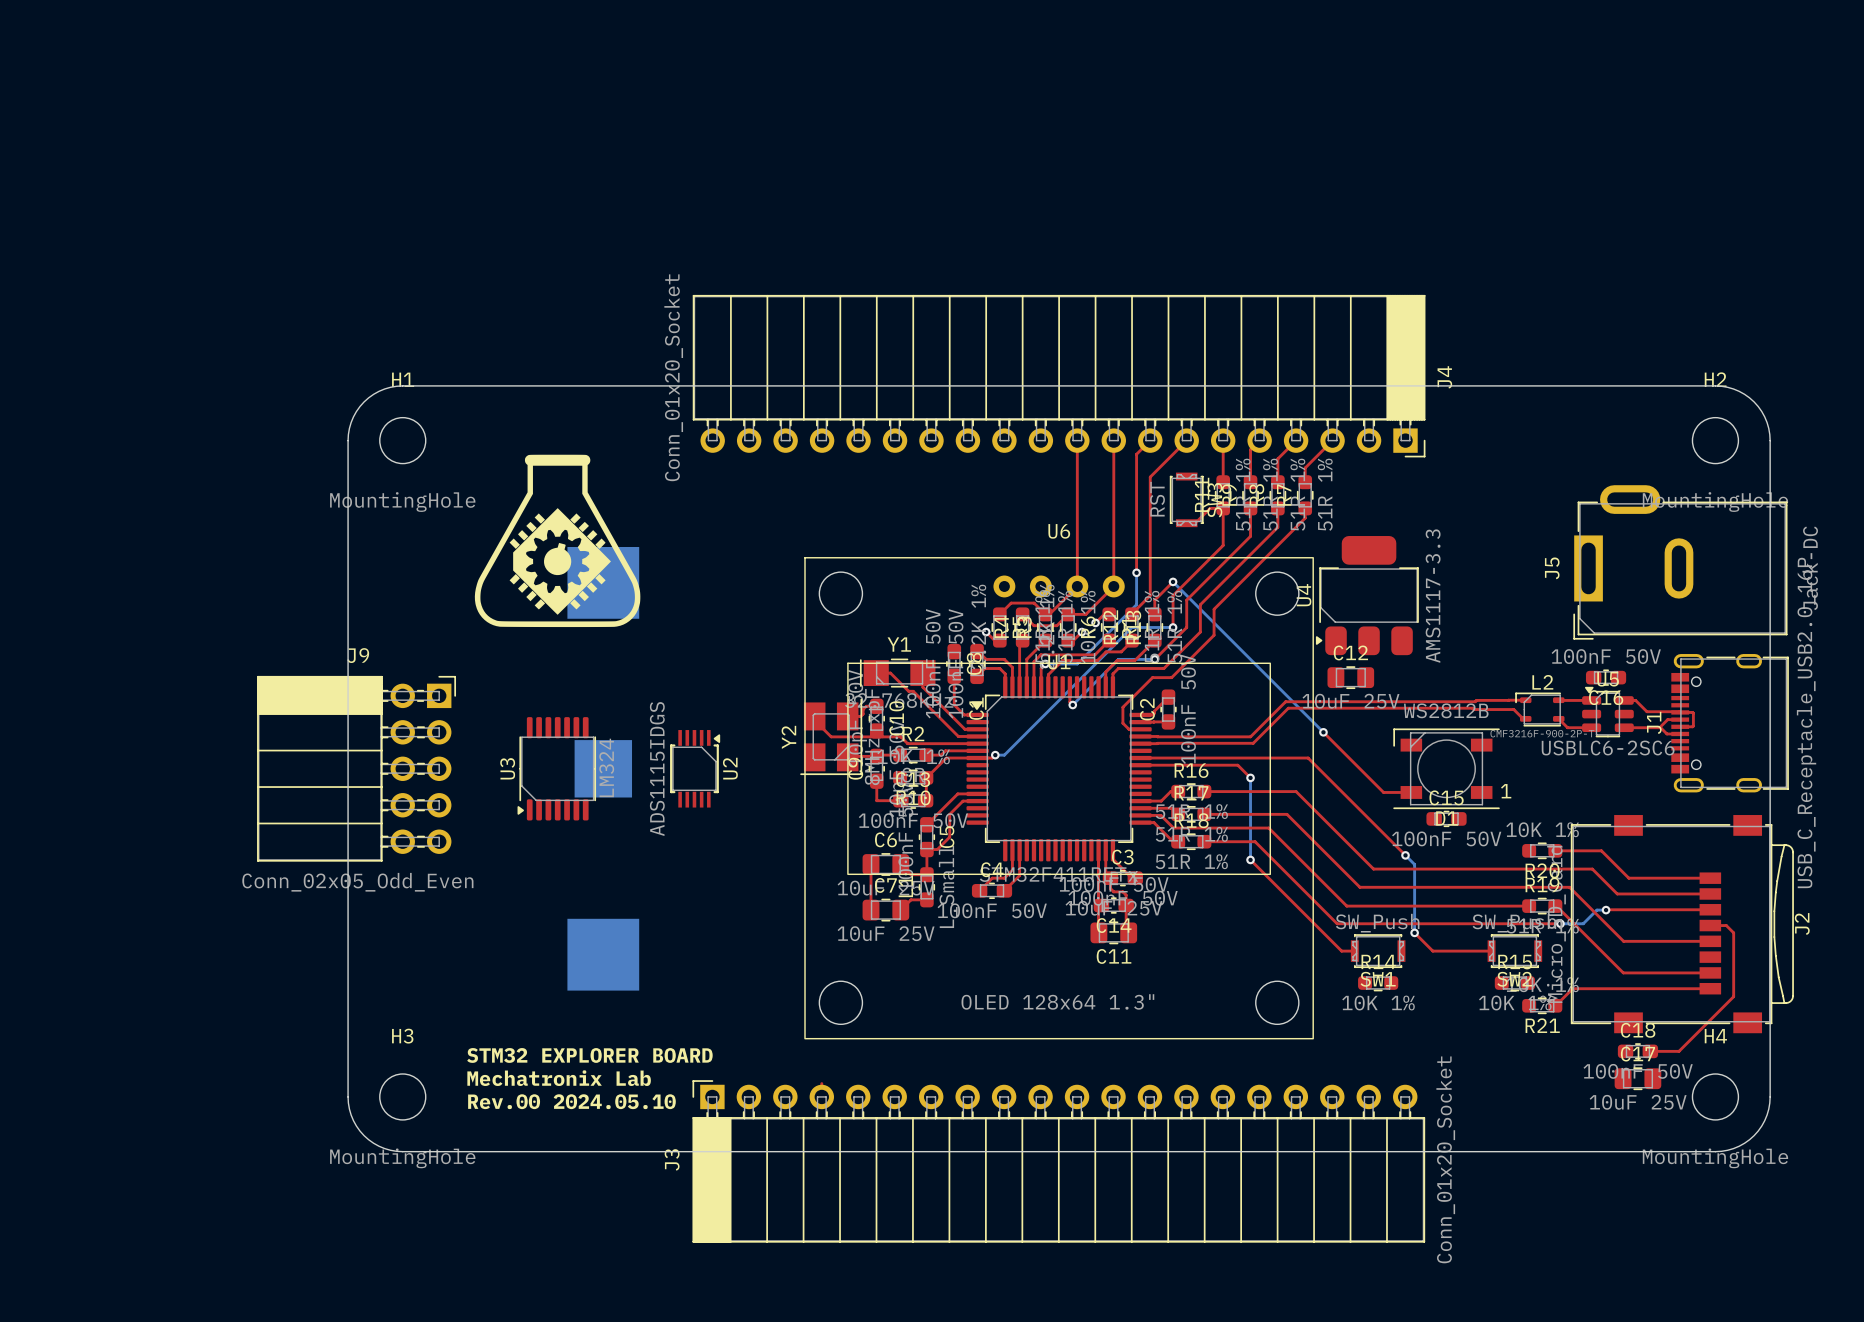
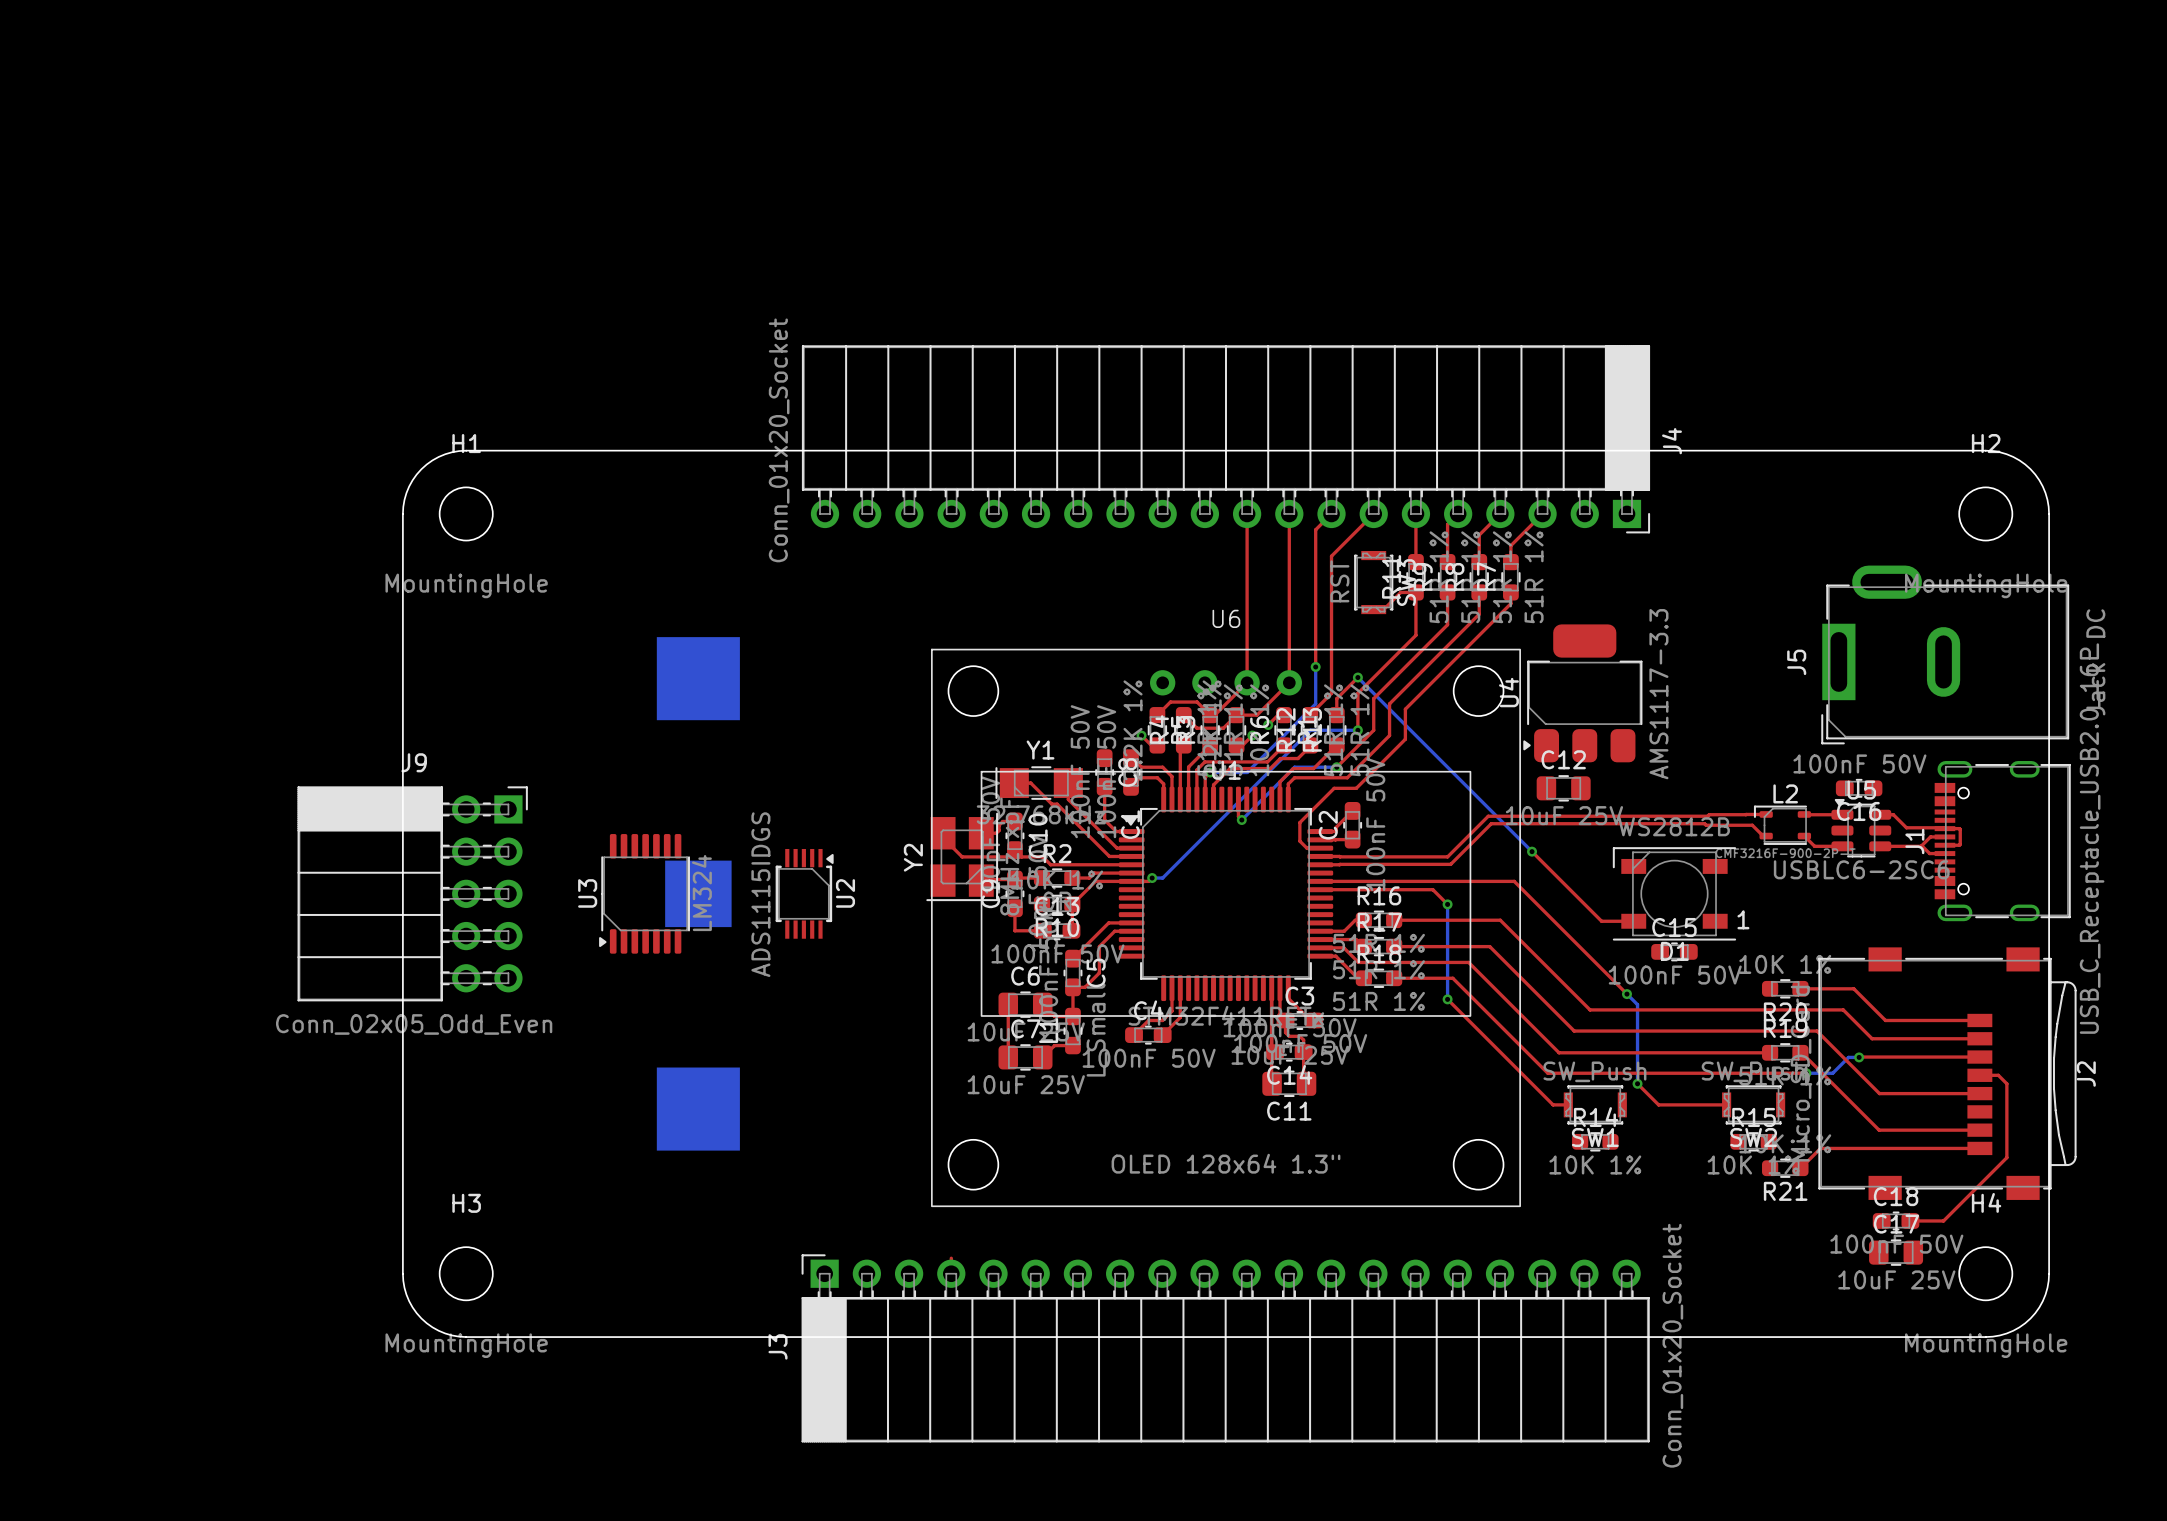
drawing: [474, 454, 641, 628] -> none
text: STM32 EXPLORER BOARD (589, 1055) -> none
text: Mechatronix Lab (559, 1078) -> none
text: Rev.00 2024.05.10 (571, 1101) -> none

